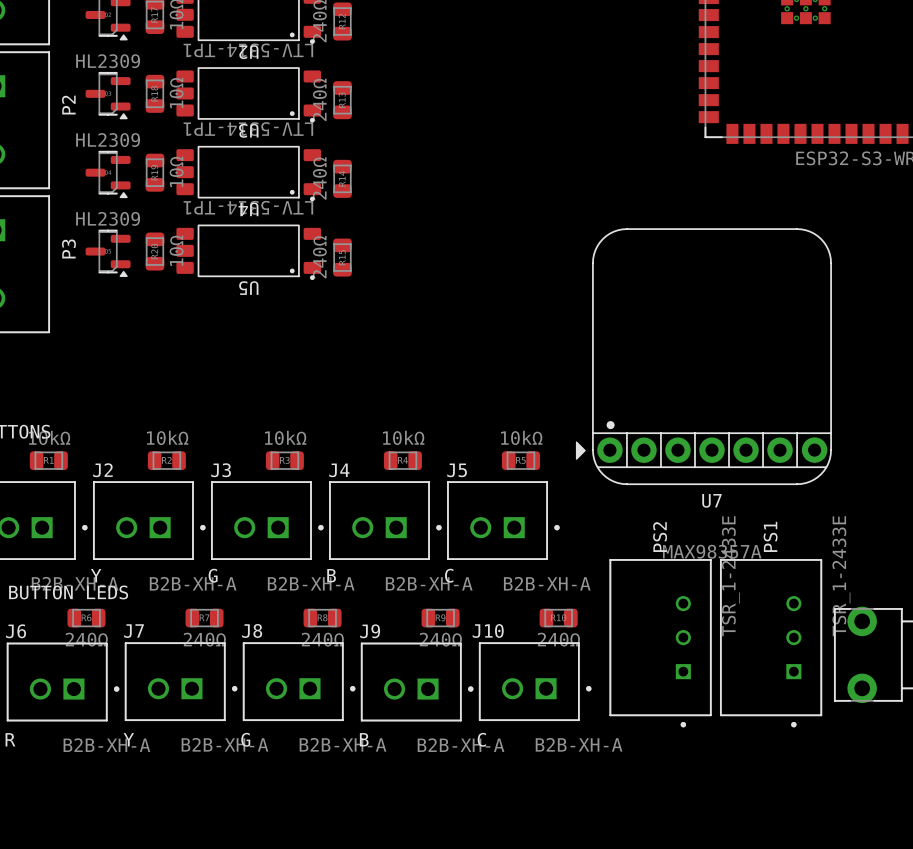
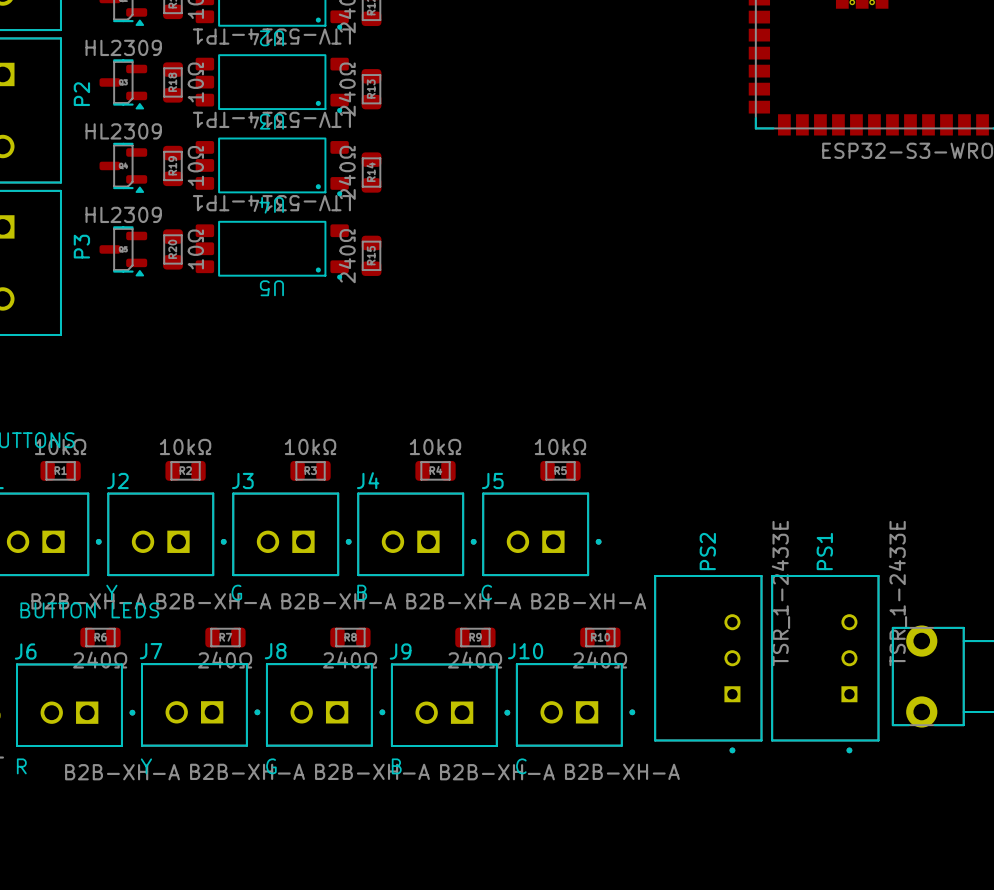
U7: MAX98357A (703, 356) -> none

